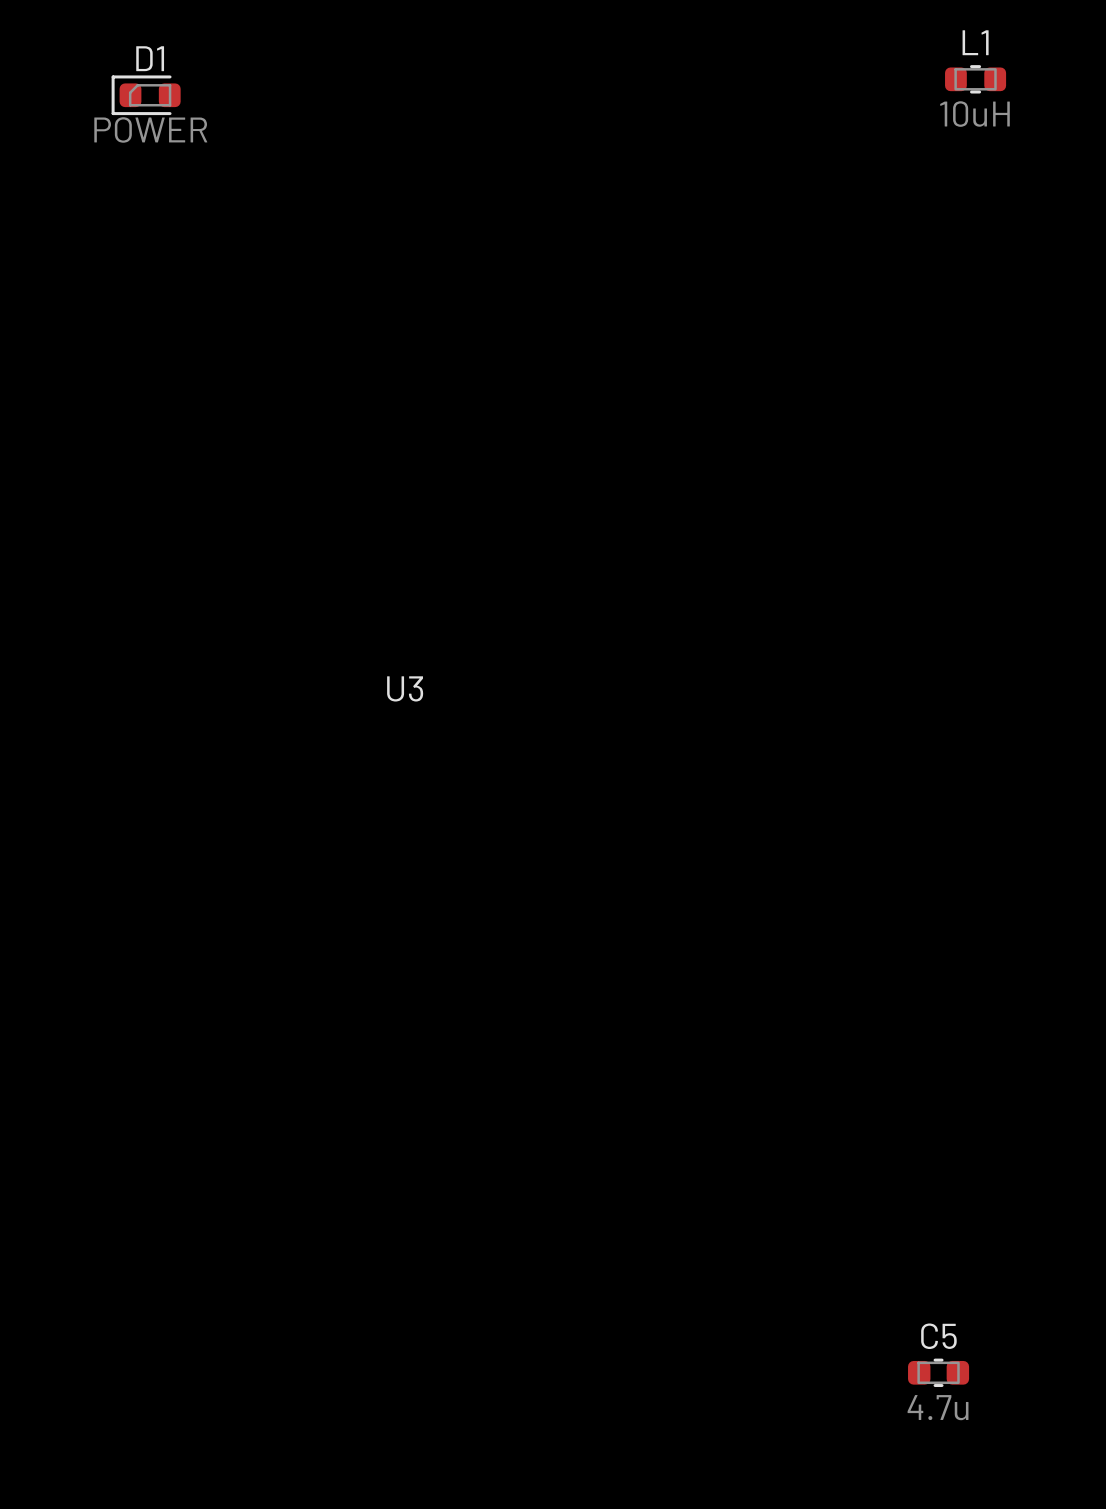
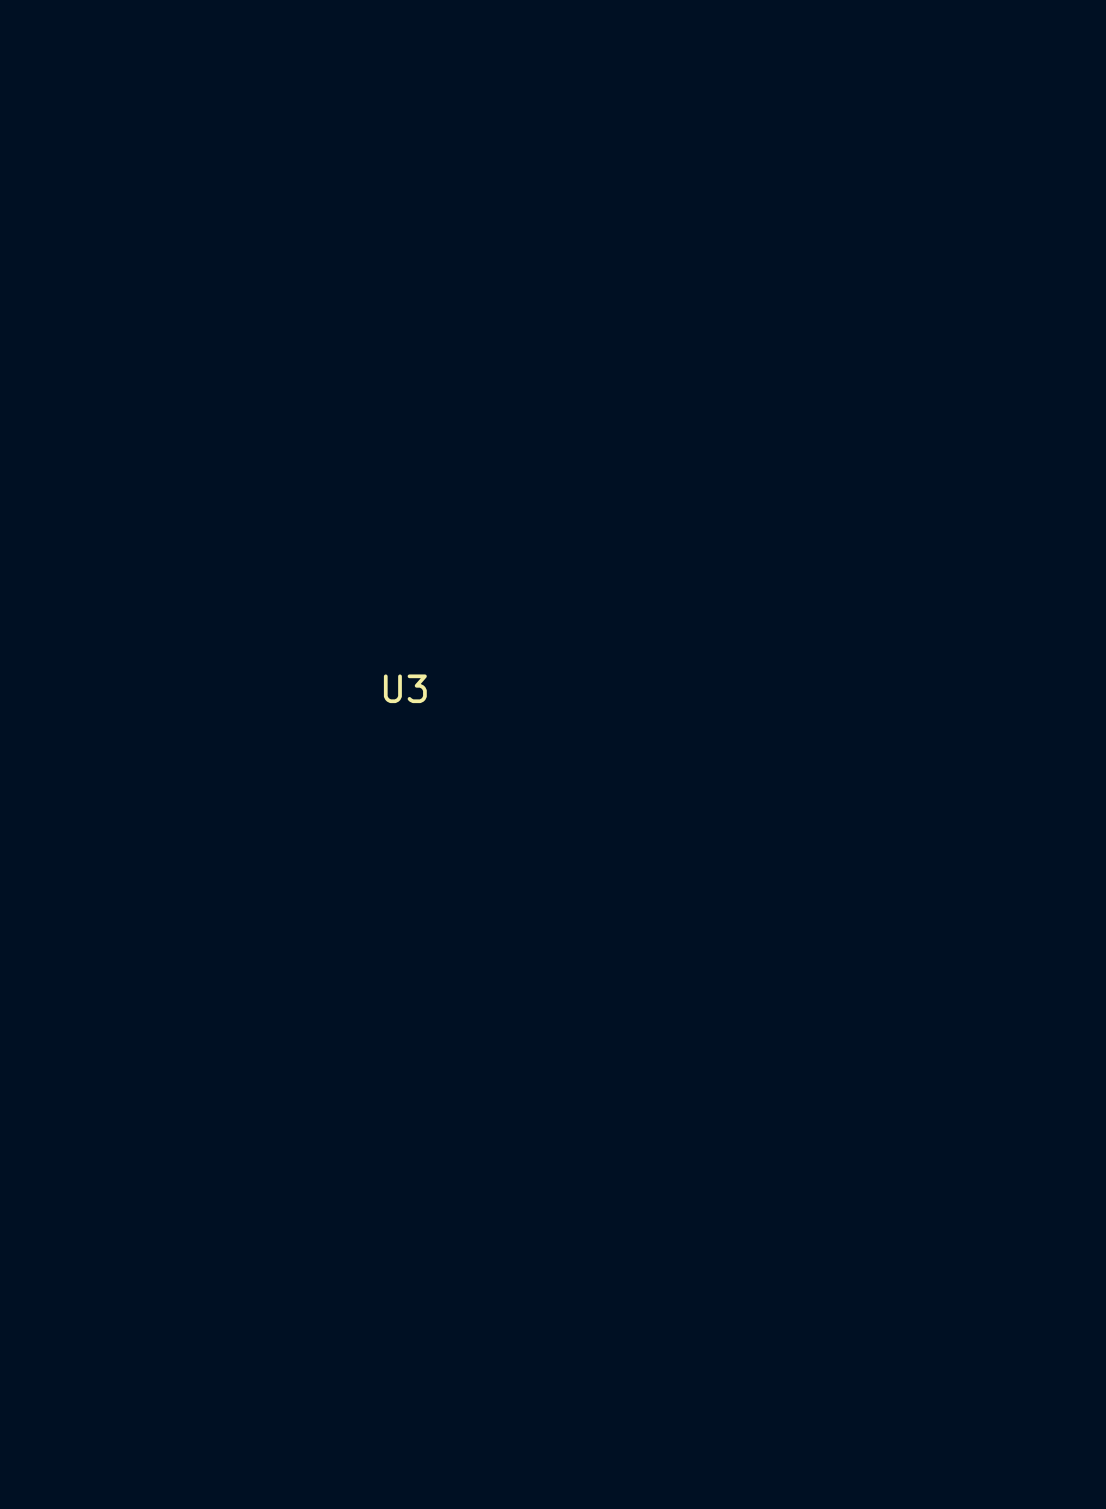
L1: 10uH (975, 79) -> none
D1: POWER (146, 95) -> none
C5: 4.7u (938, 1372) -> none

